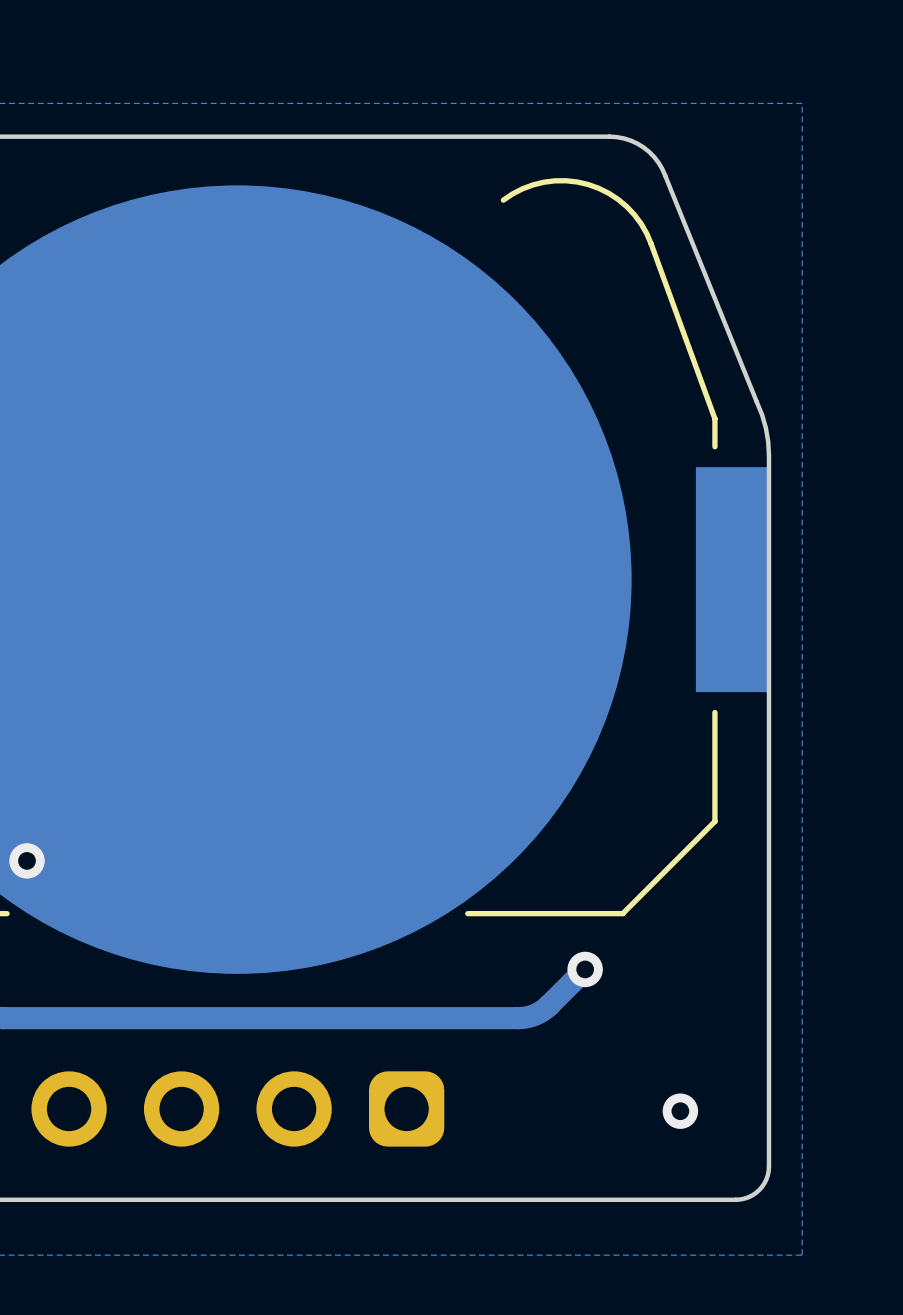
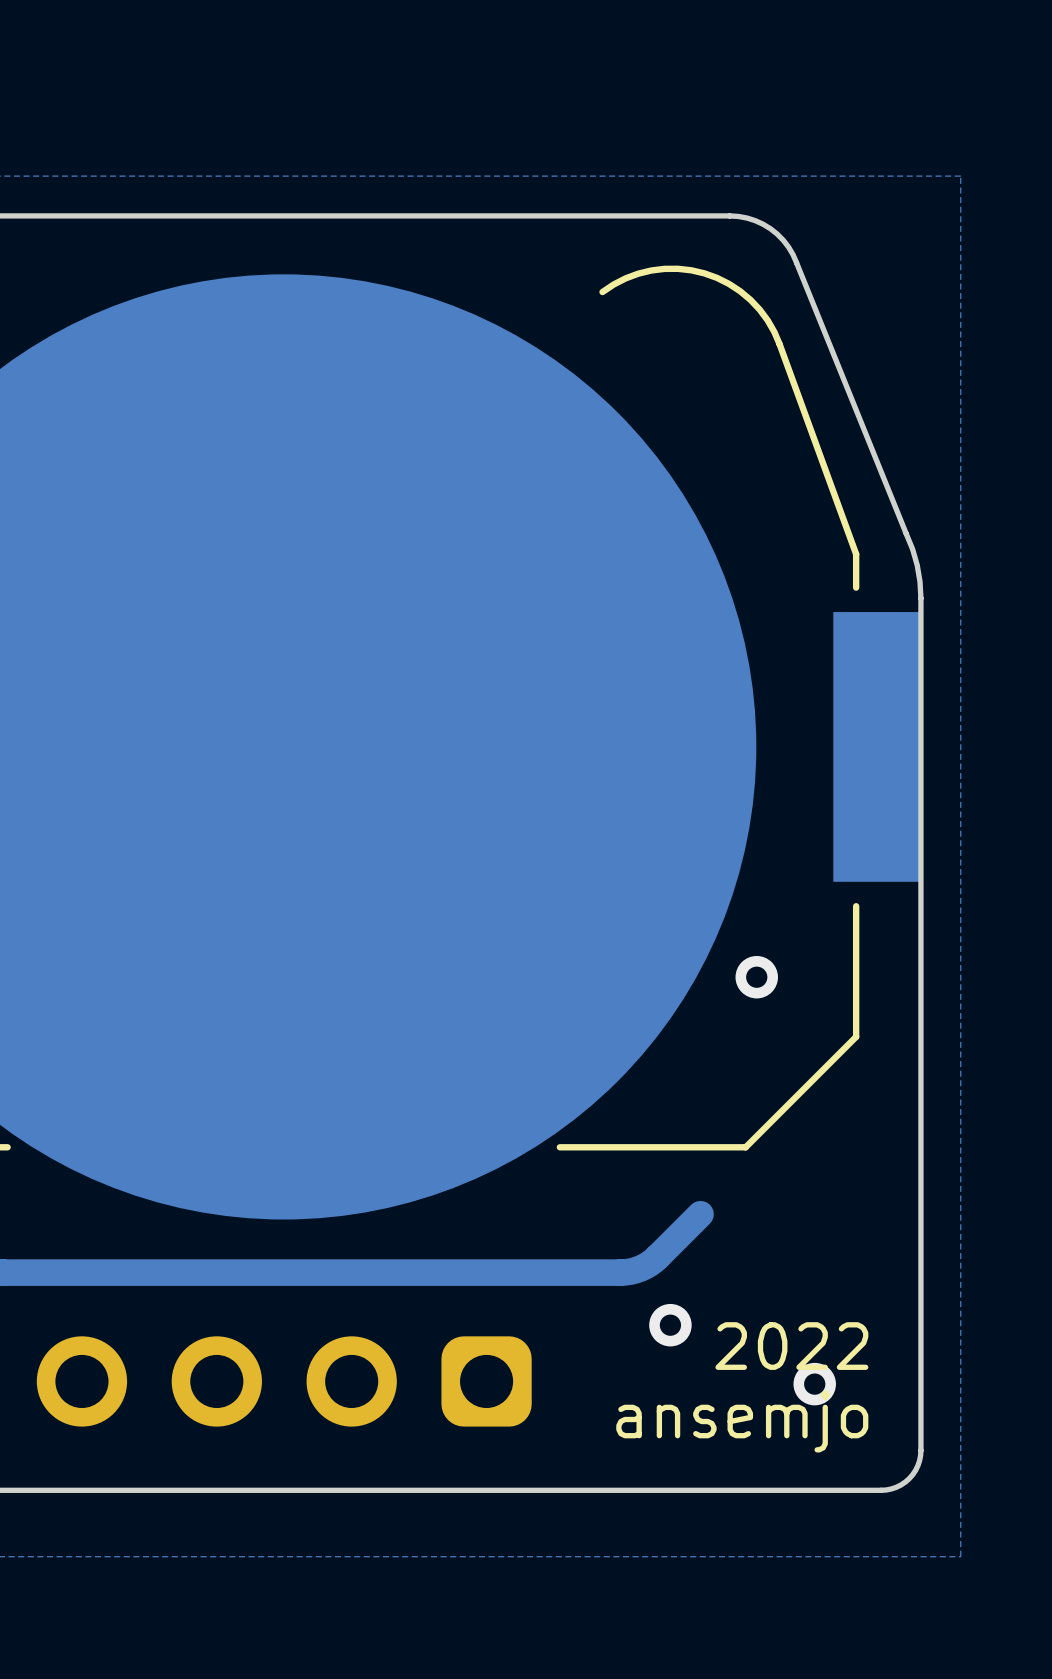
via: none -> (756, 977)
via: (27, 860) -> none
via position: (585, 969) -> (670, 1325)
text: none -> 2022 (791, 1346)
text: none -> ansemjo (742, 1421)

